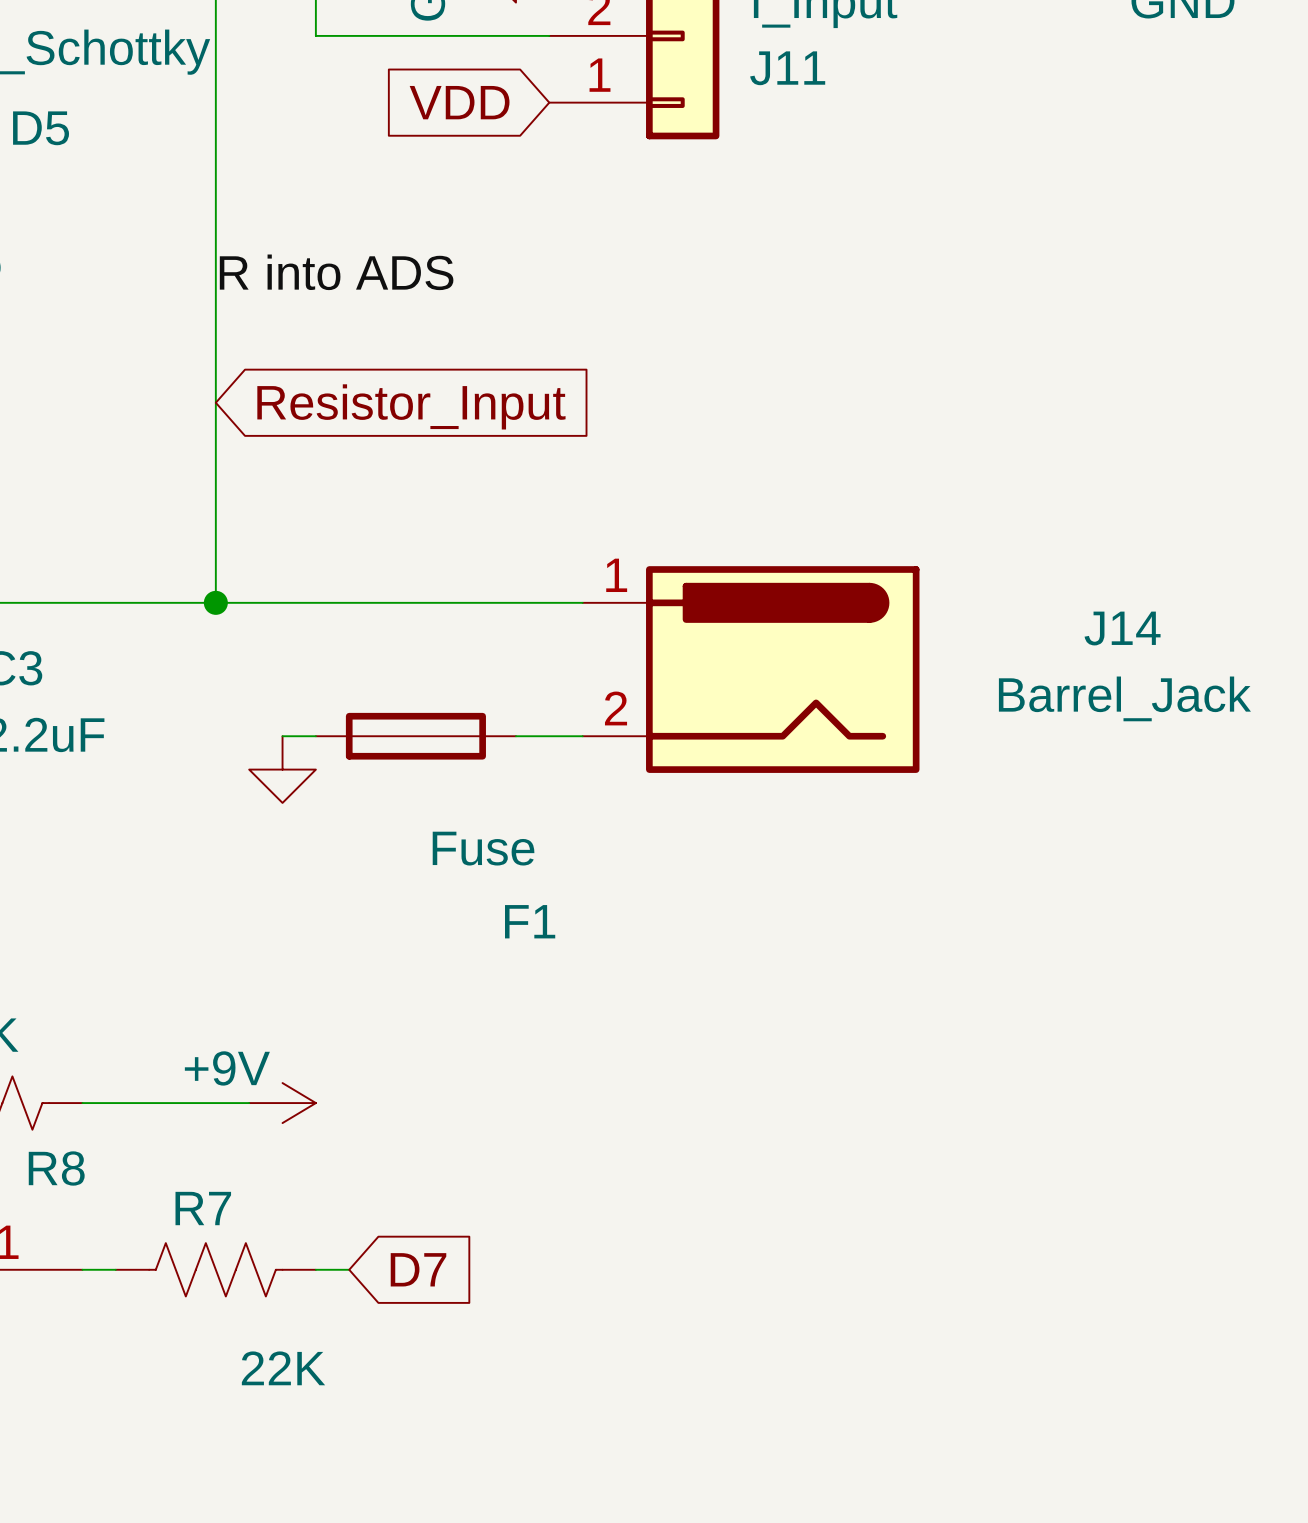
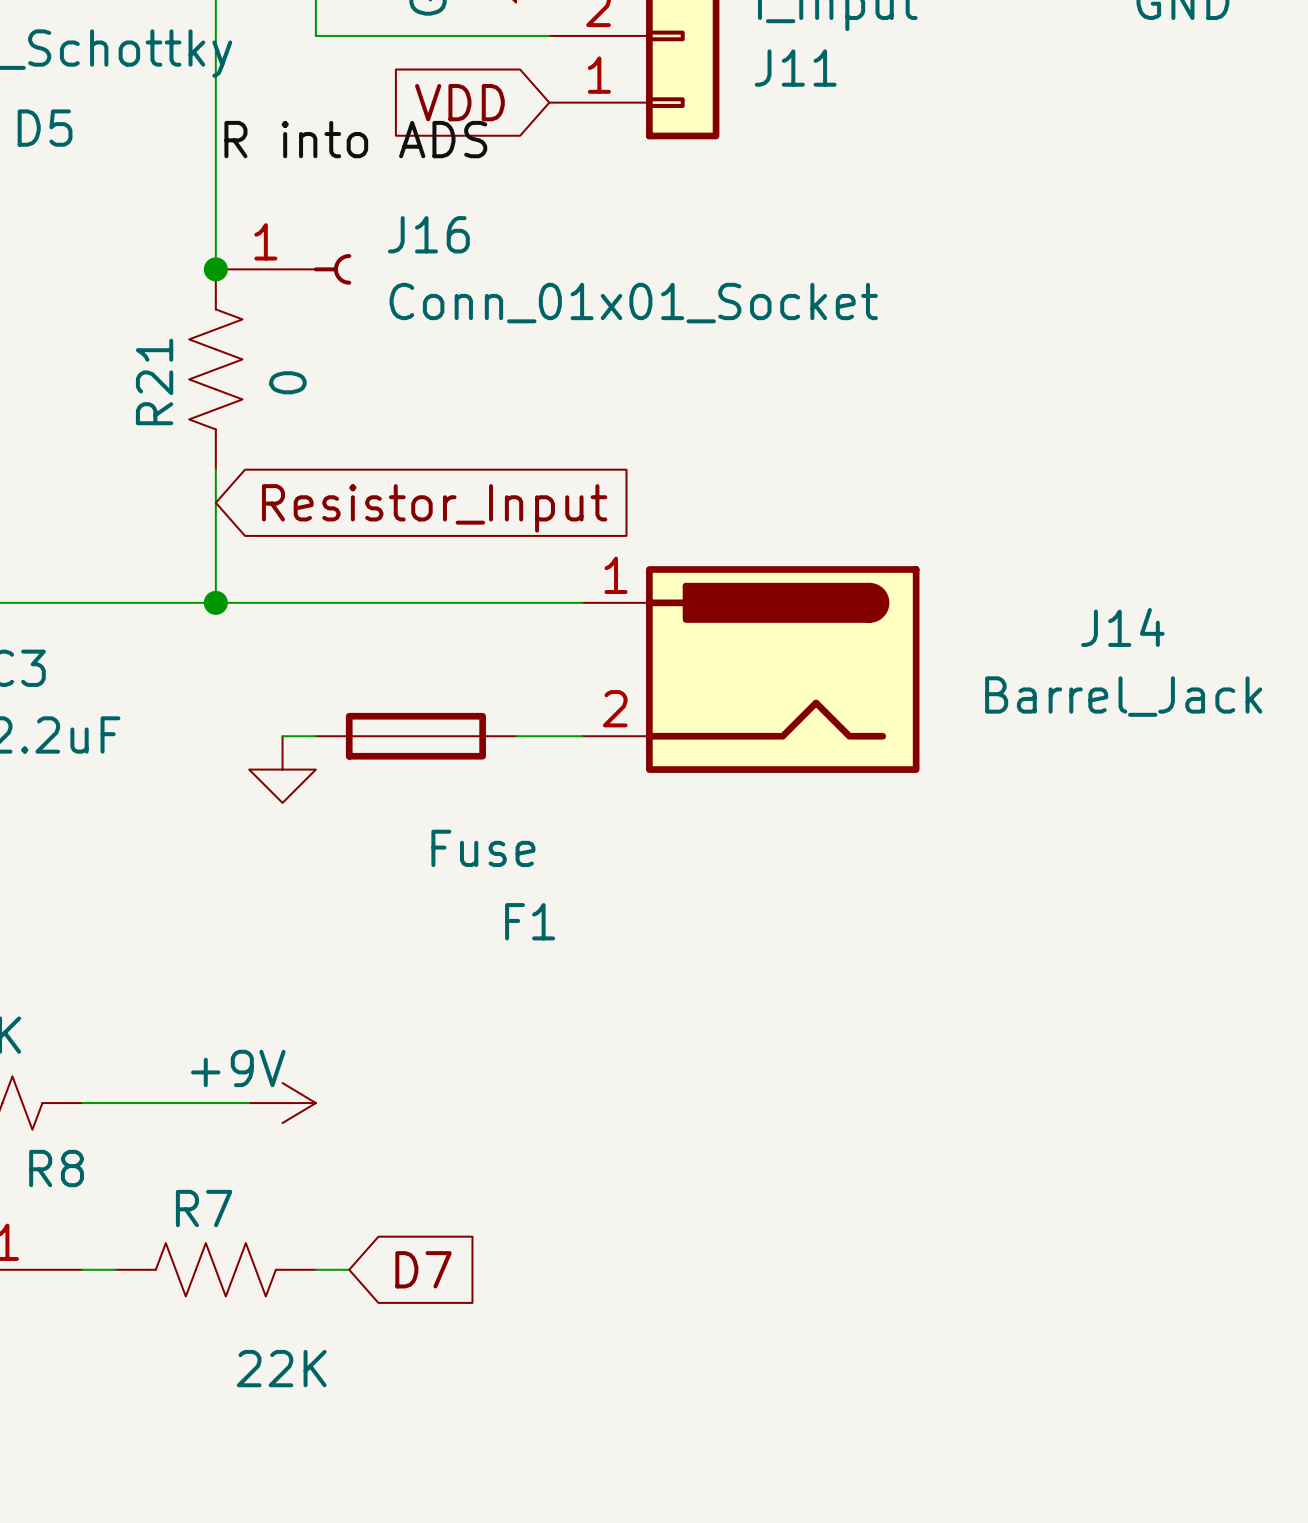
wire: (215, 269) (215, 469) -> none
junction: none -> (215, 269)
J16: none -> Conn_01x01_Socket (283, 269)
label position: R into ADS (336, 272) -> R into ADS (355, 139)
R21: none -> 0 (215, 369)
global label position: Resistor_Input (411, 406) -> Resistor_Input (434, 508)

